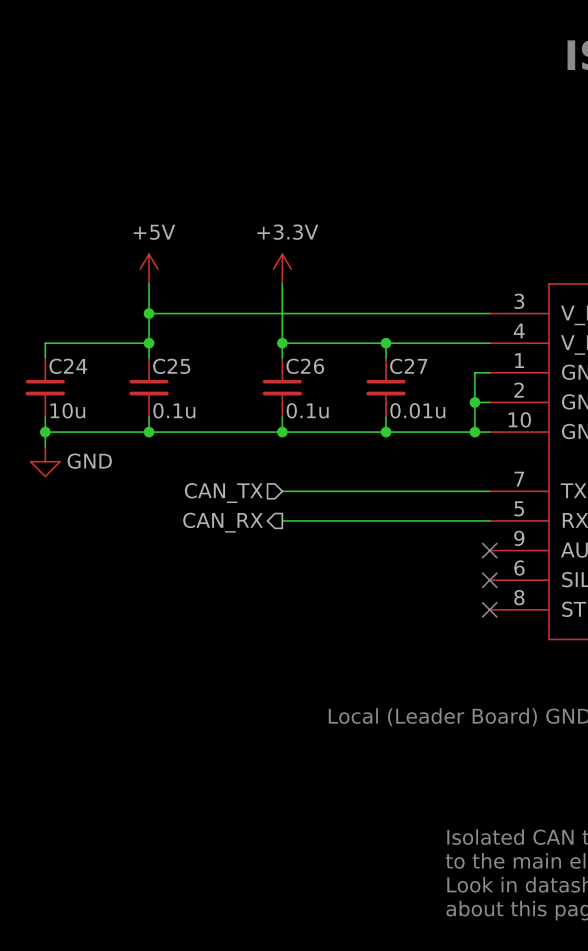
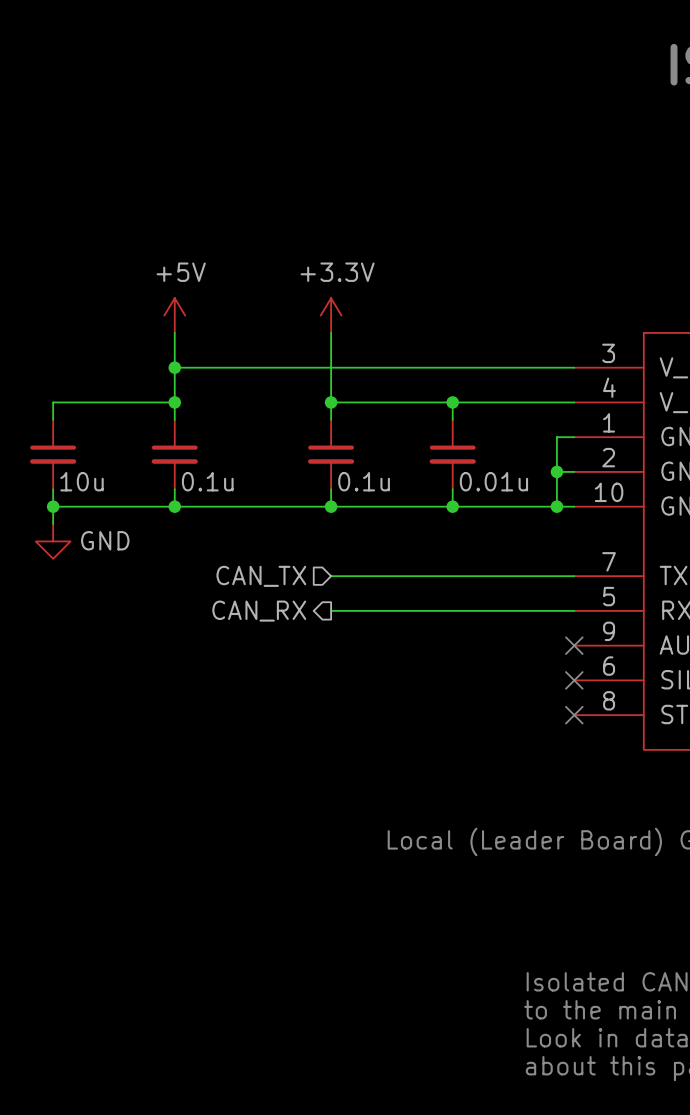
C24 name: C24 (68, 366) -> none
C25 name: C25 (171, 366) -> none
C26 name: C26 (305, 366) -> none
C27 name: C27 (408, 366) -> none

